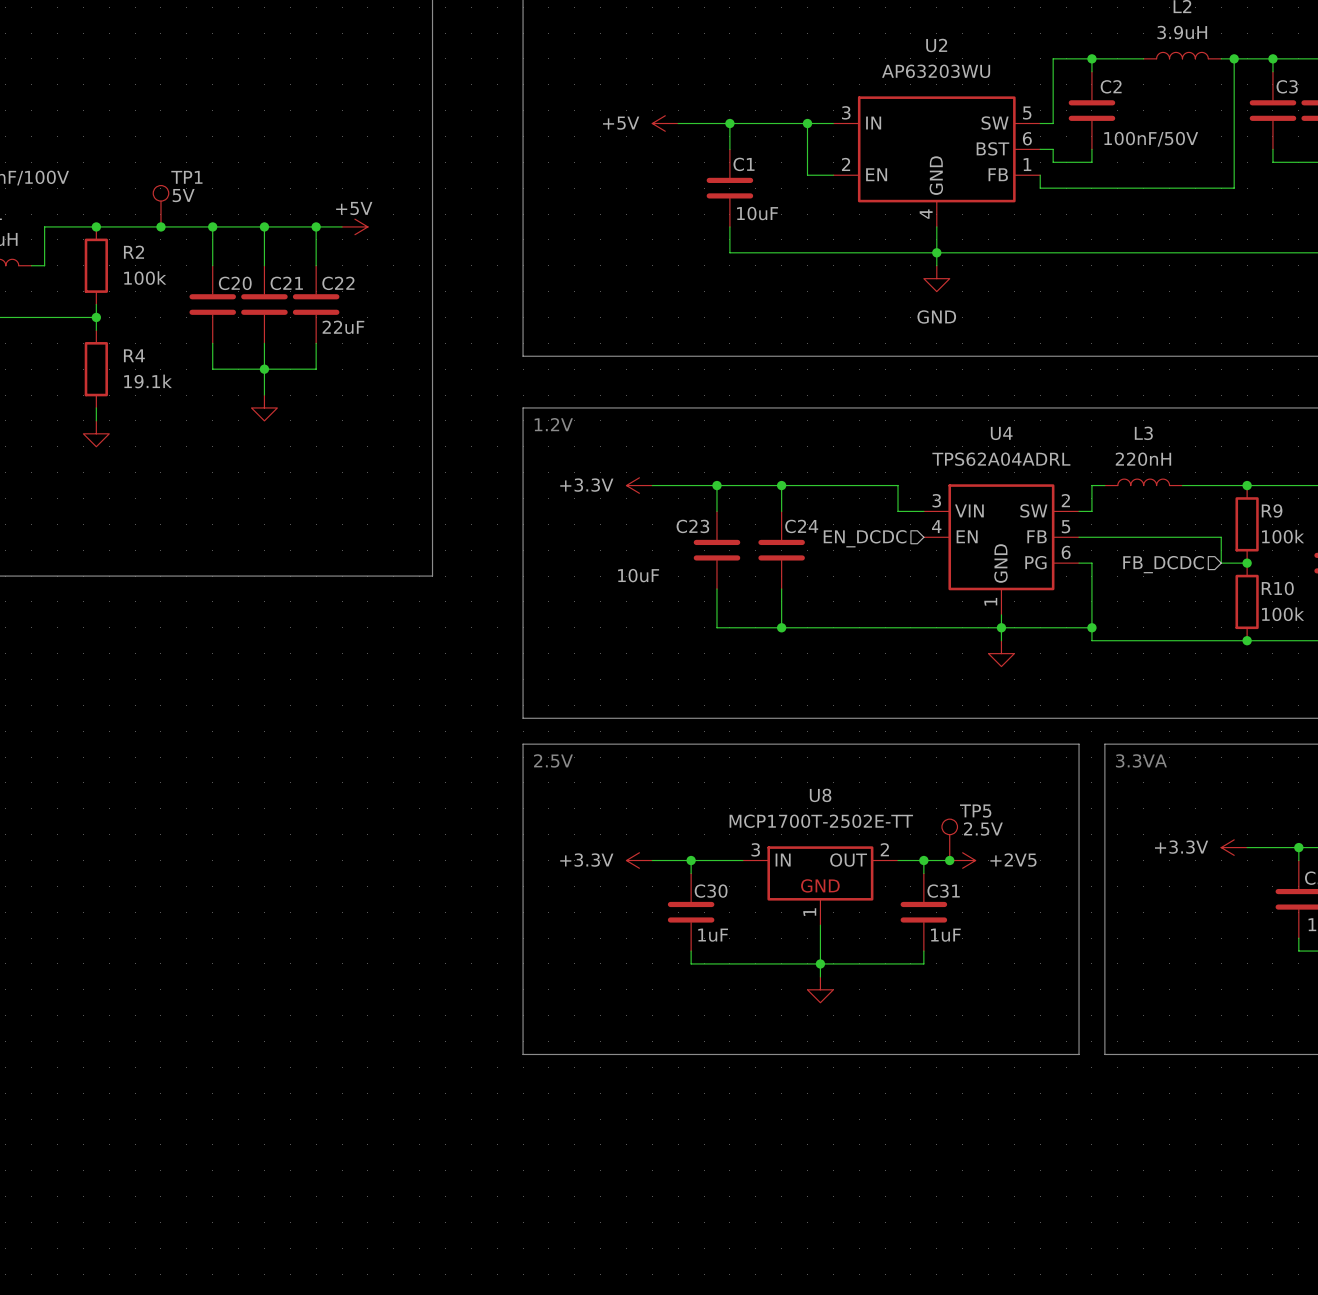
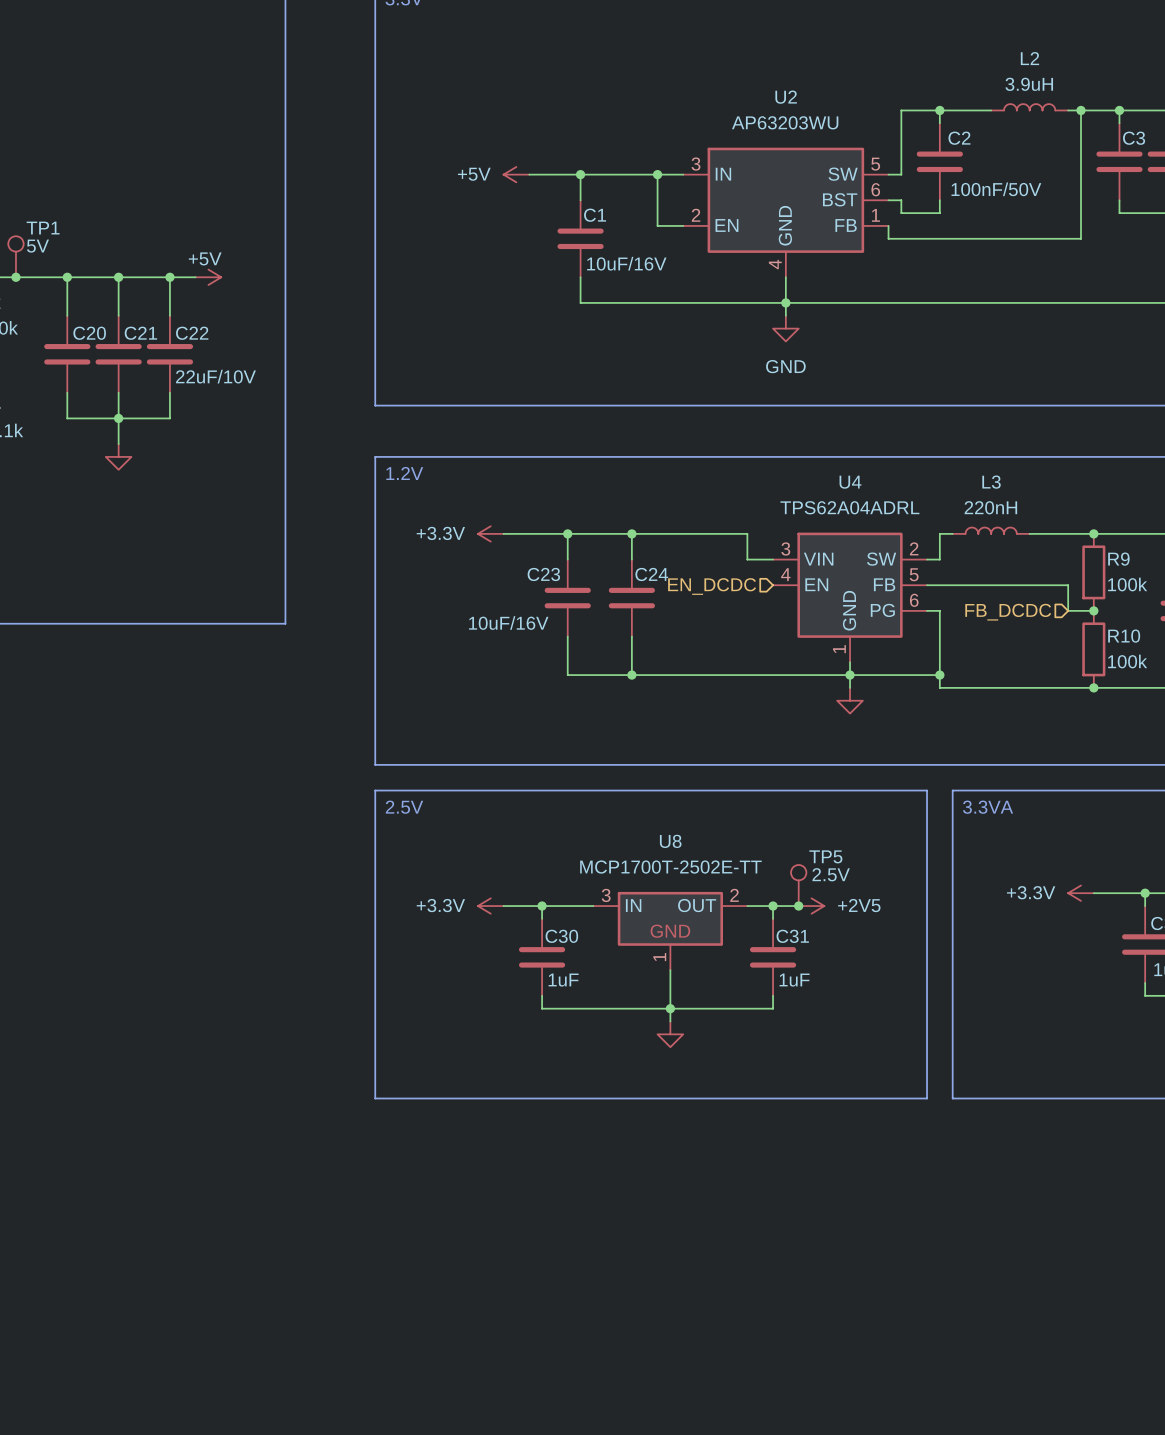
C1 value: 10uF (757, 213) -> 10uF/16V (626, 263)
C22 value: 22uF (343, 327) -> 22uF/10V (215, 376)
C23 value: 10uF (638, 575) -> 10uF/16V (508, 623)

